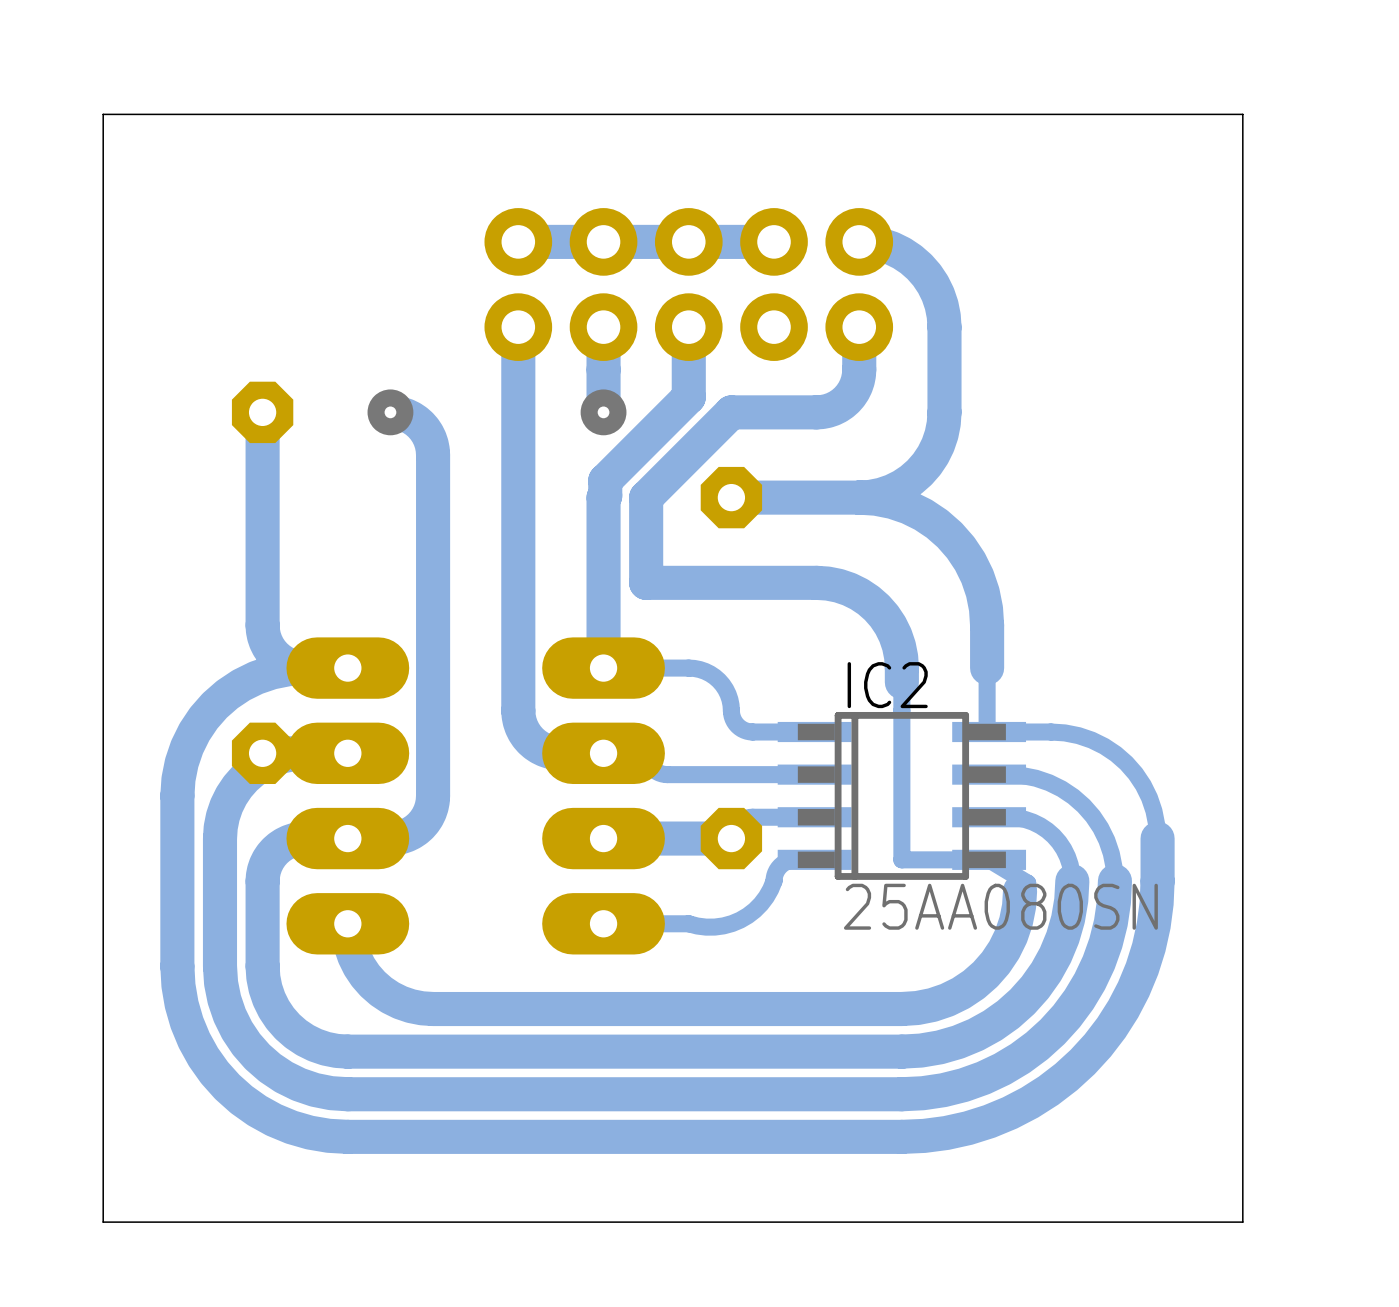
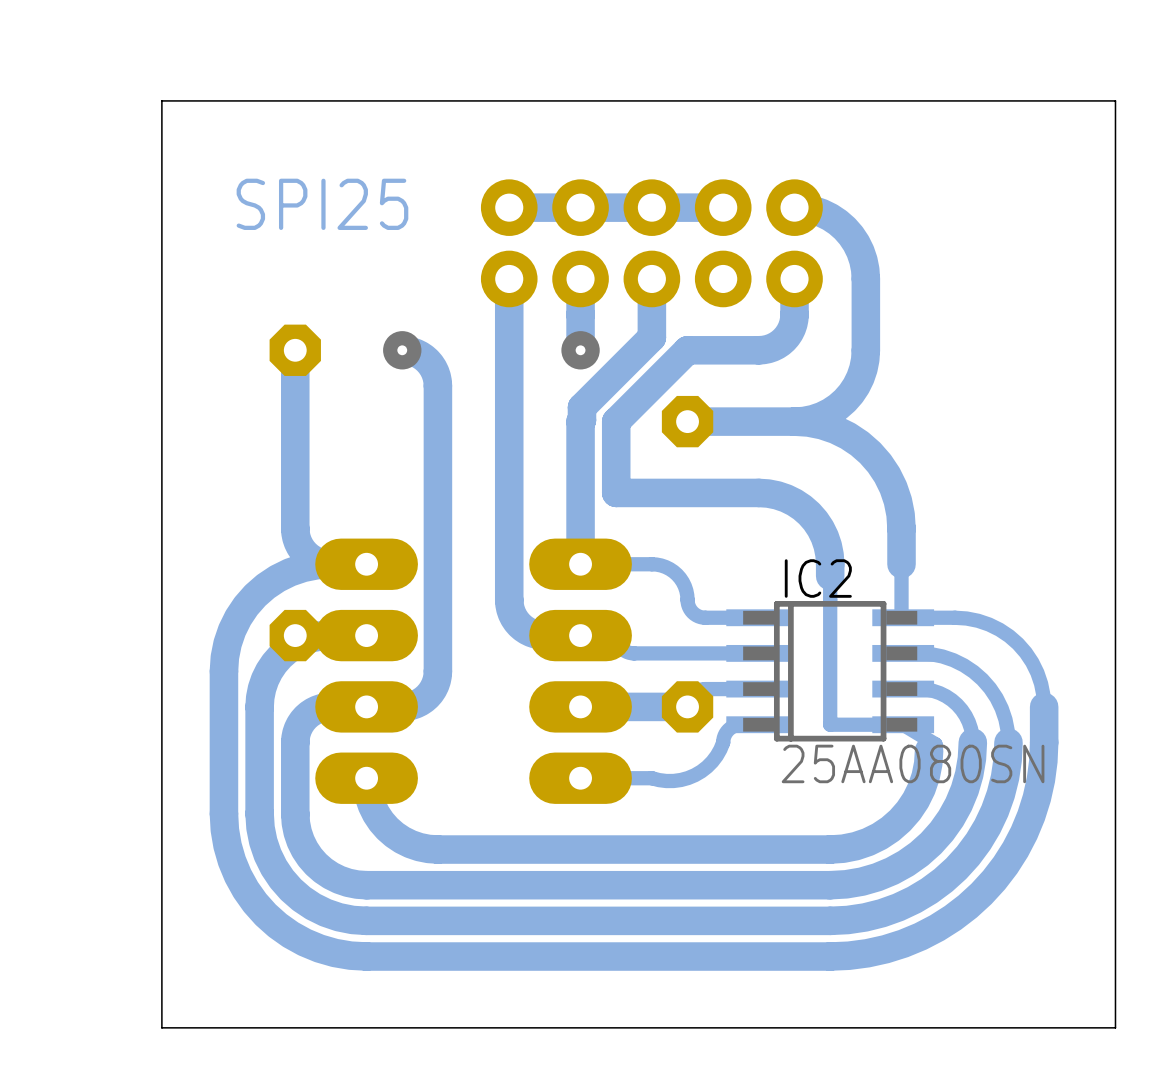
text: none -> SPI25 (322, 204)

